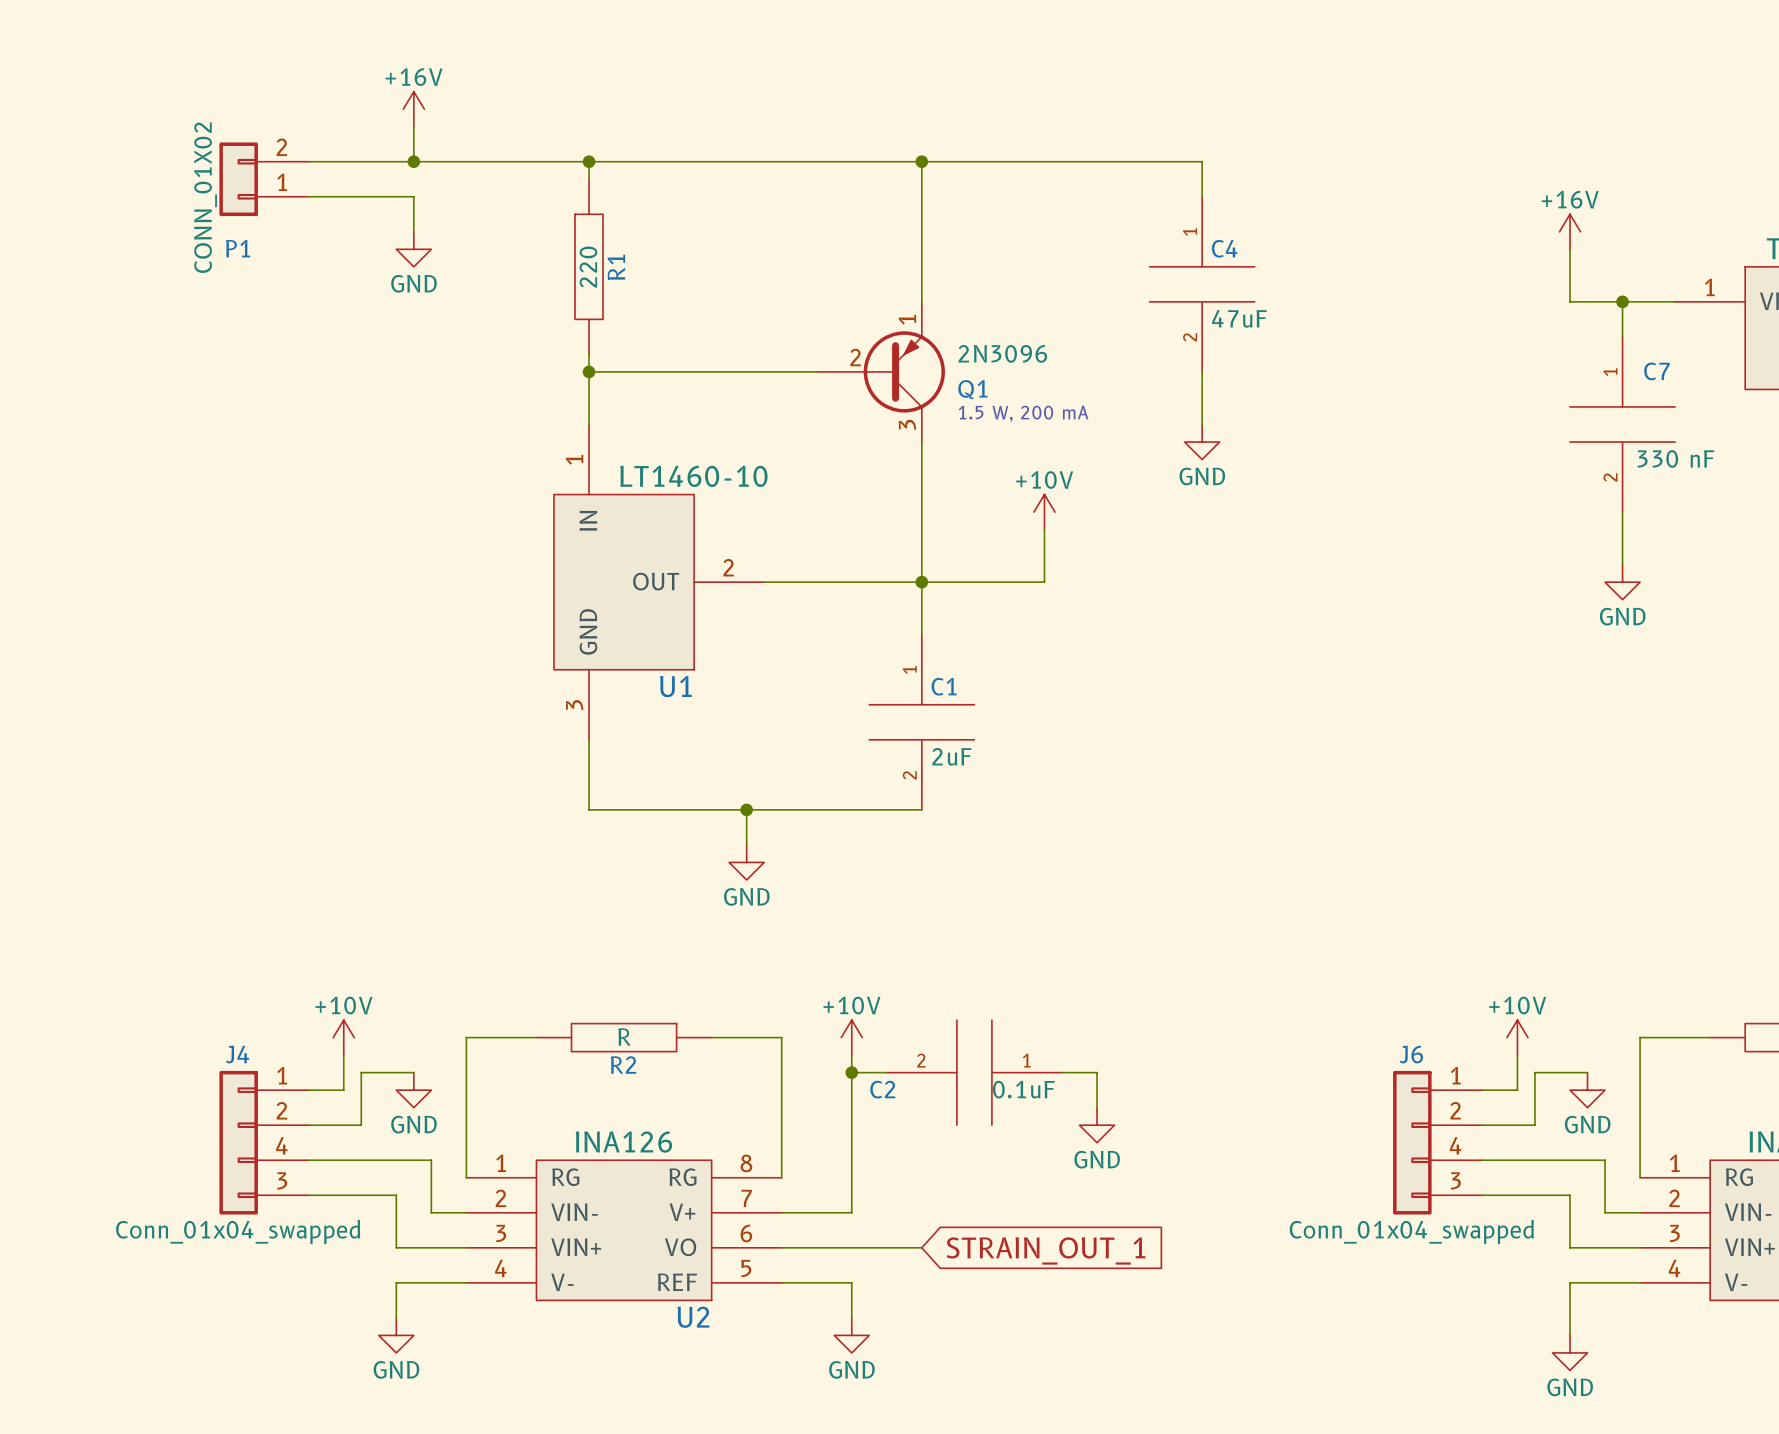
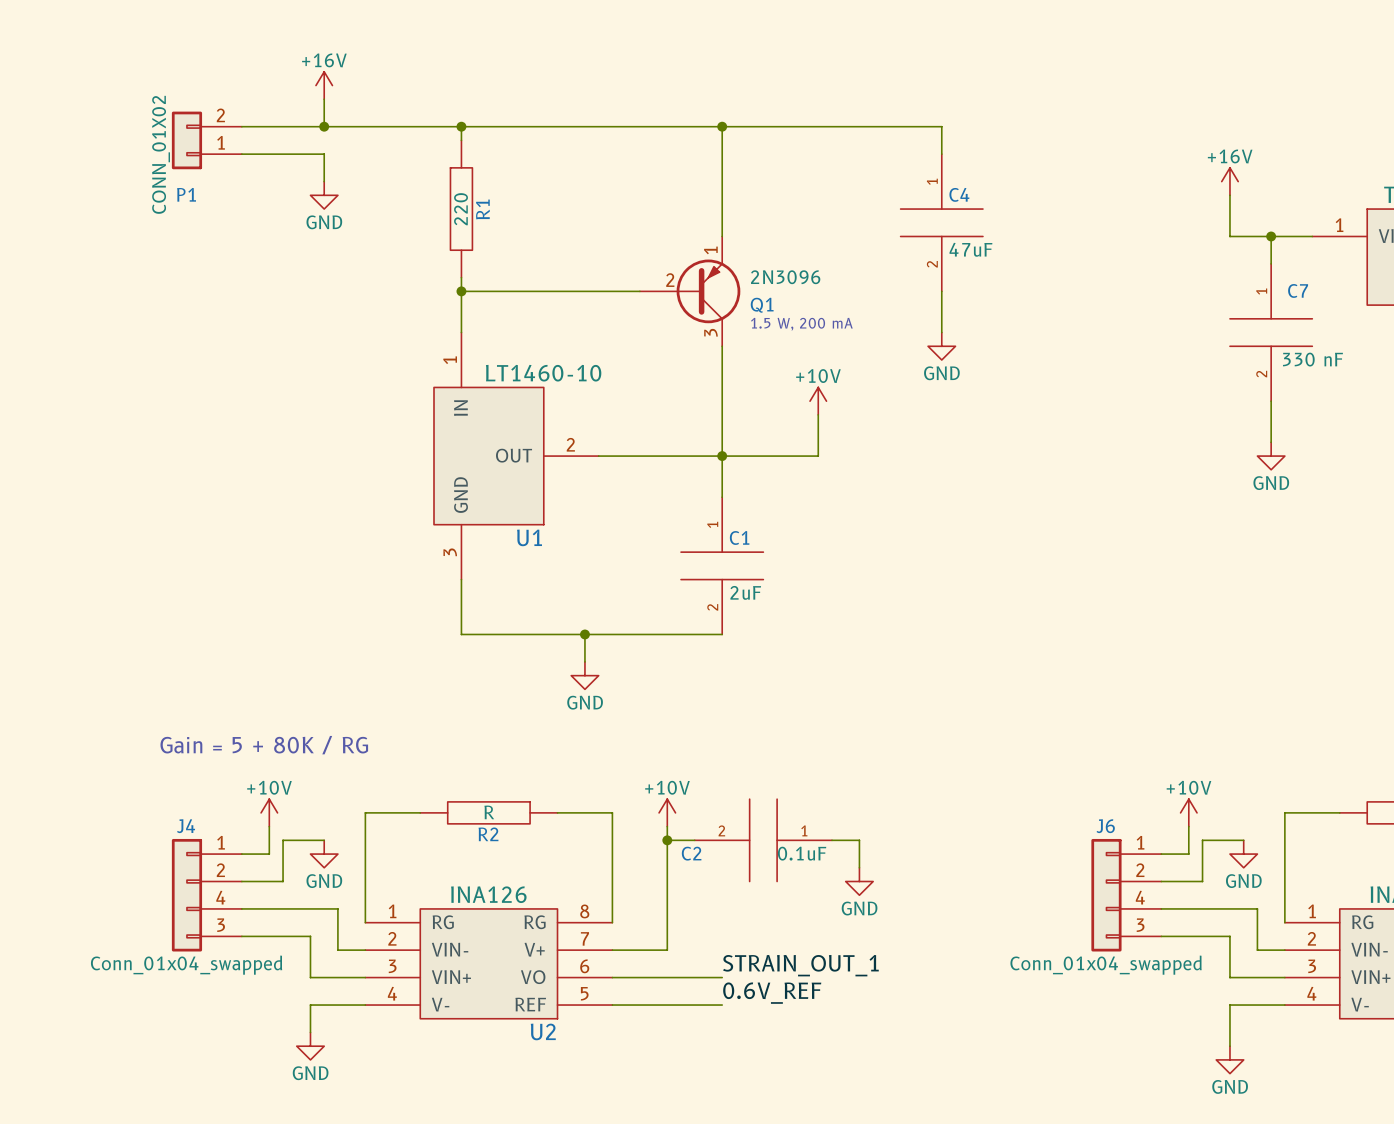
text: none -> Gain = 5 + 80K / RG (264, 745)
label: none -> STRAIN_OUT_1 (800, 965)
global label: STRAIN_OUT_1 (1045, 1250) -> none
label: none -> 0.6V_REF (772, 993)
wire: (851, 1282) (851, 1317) -> (667, 1005) (722, 1005)
power symbol: GND (851, 1335) -> none

